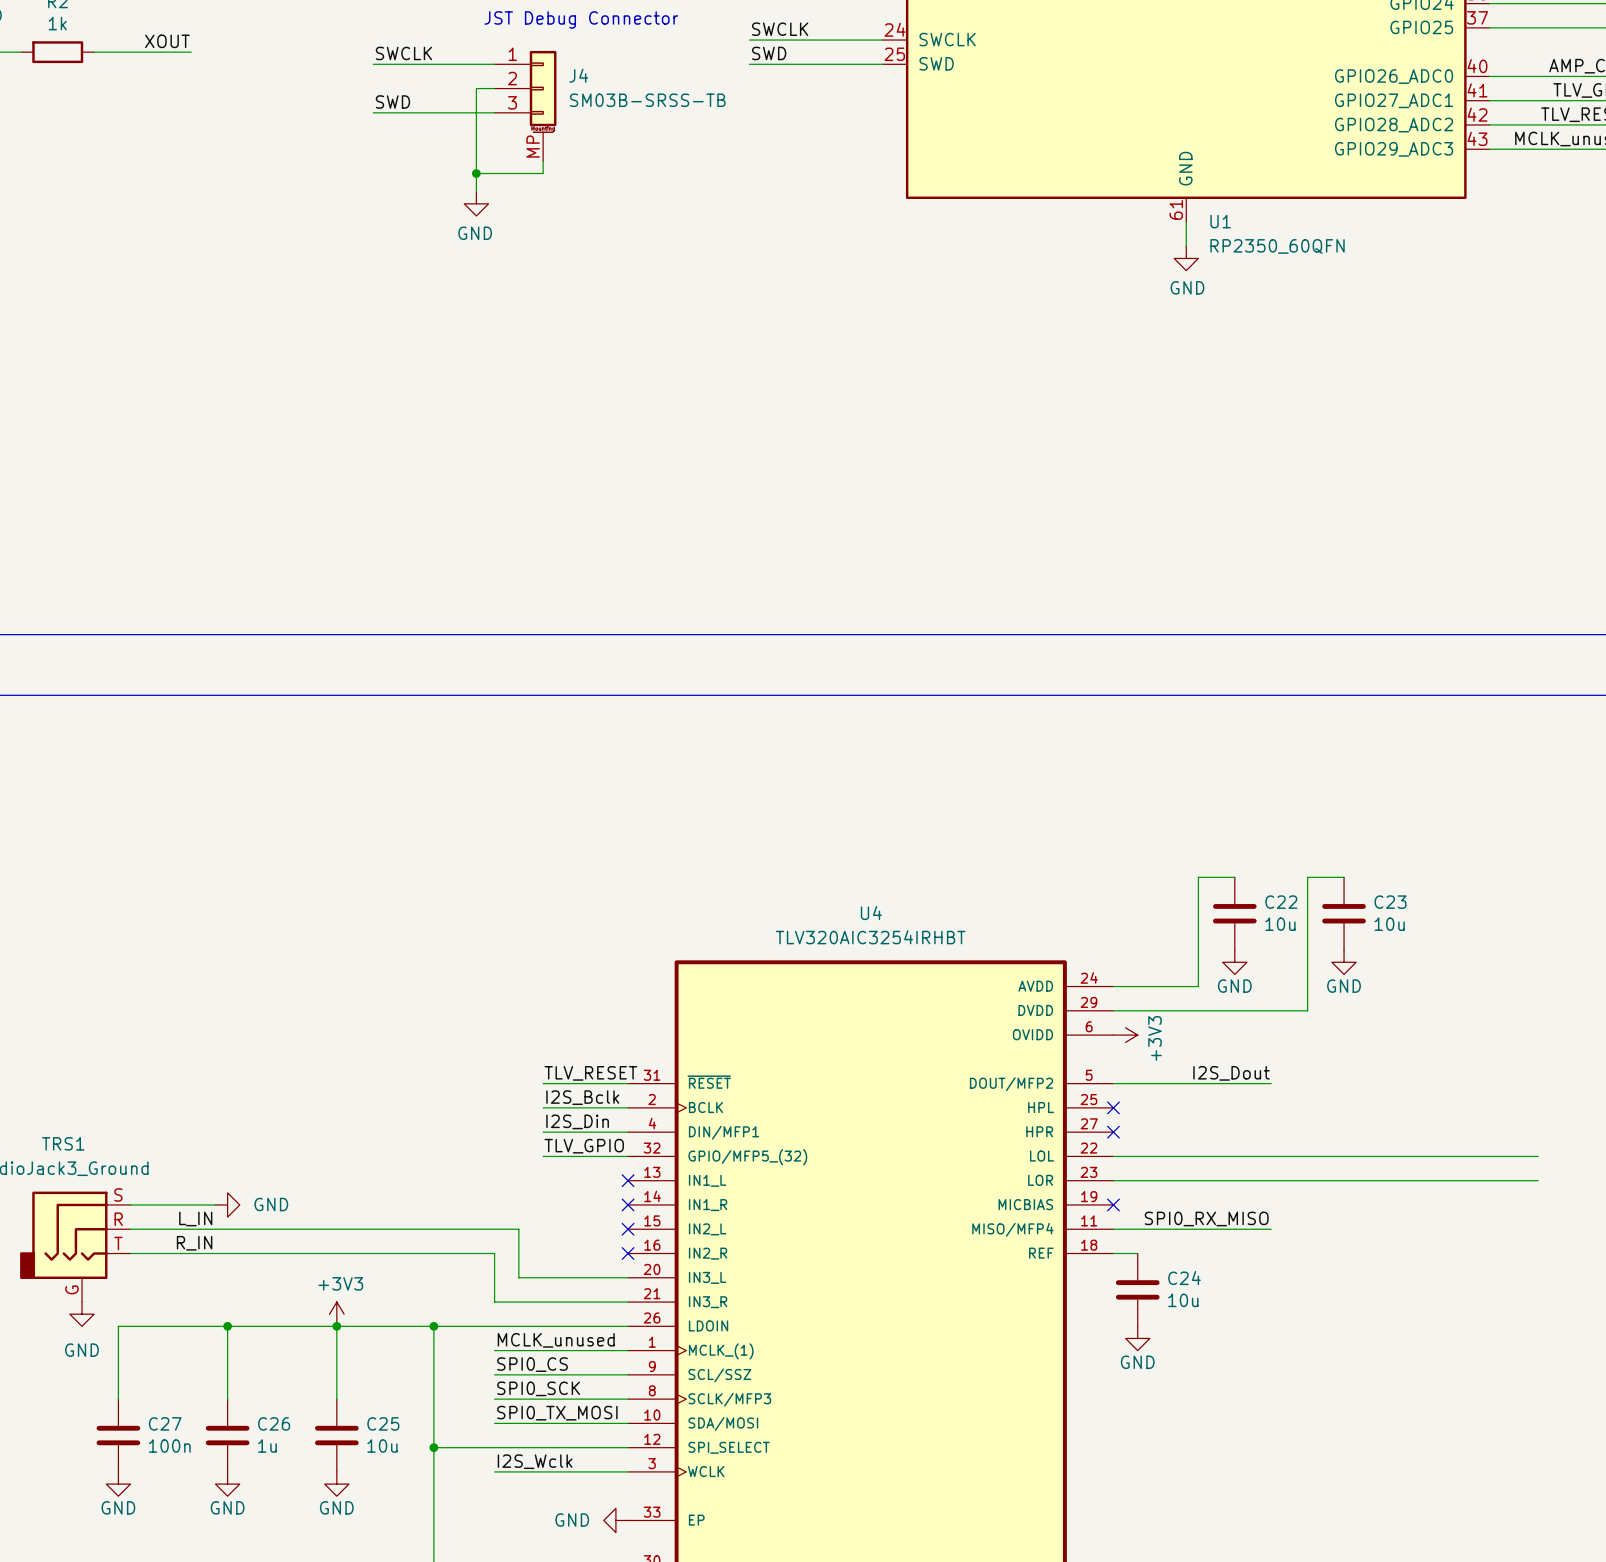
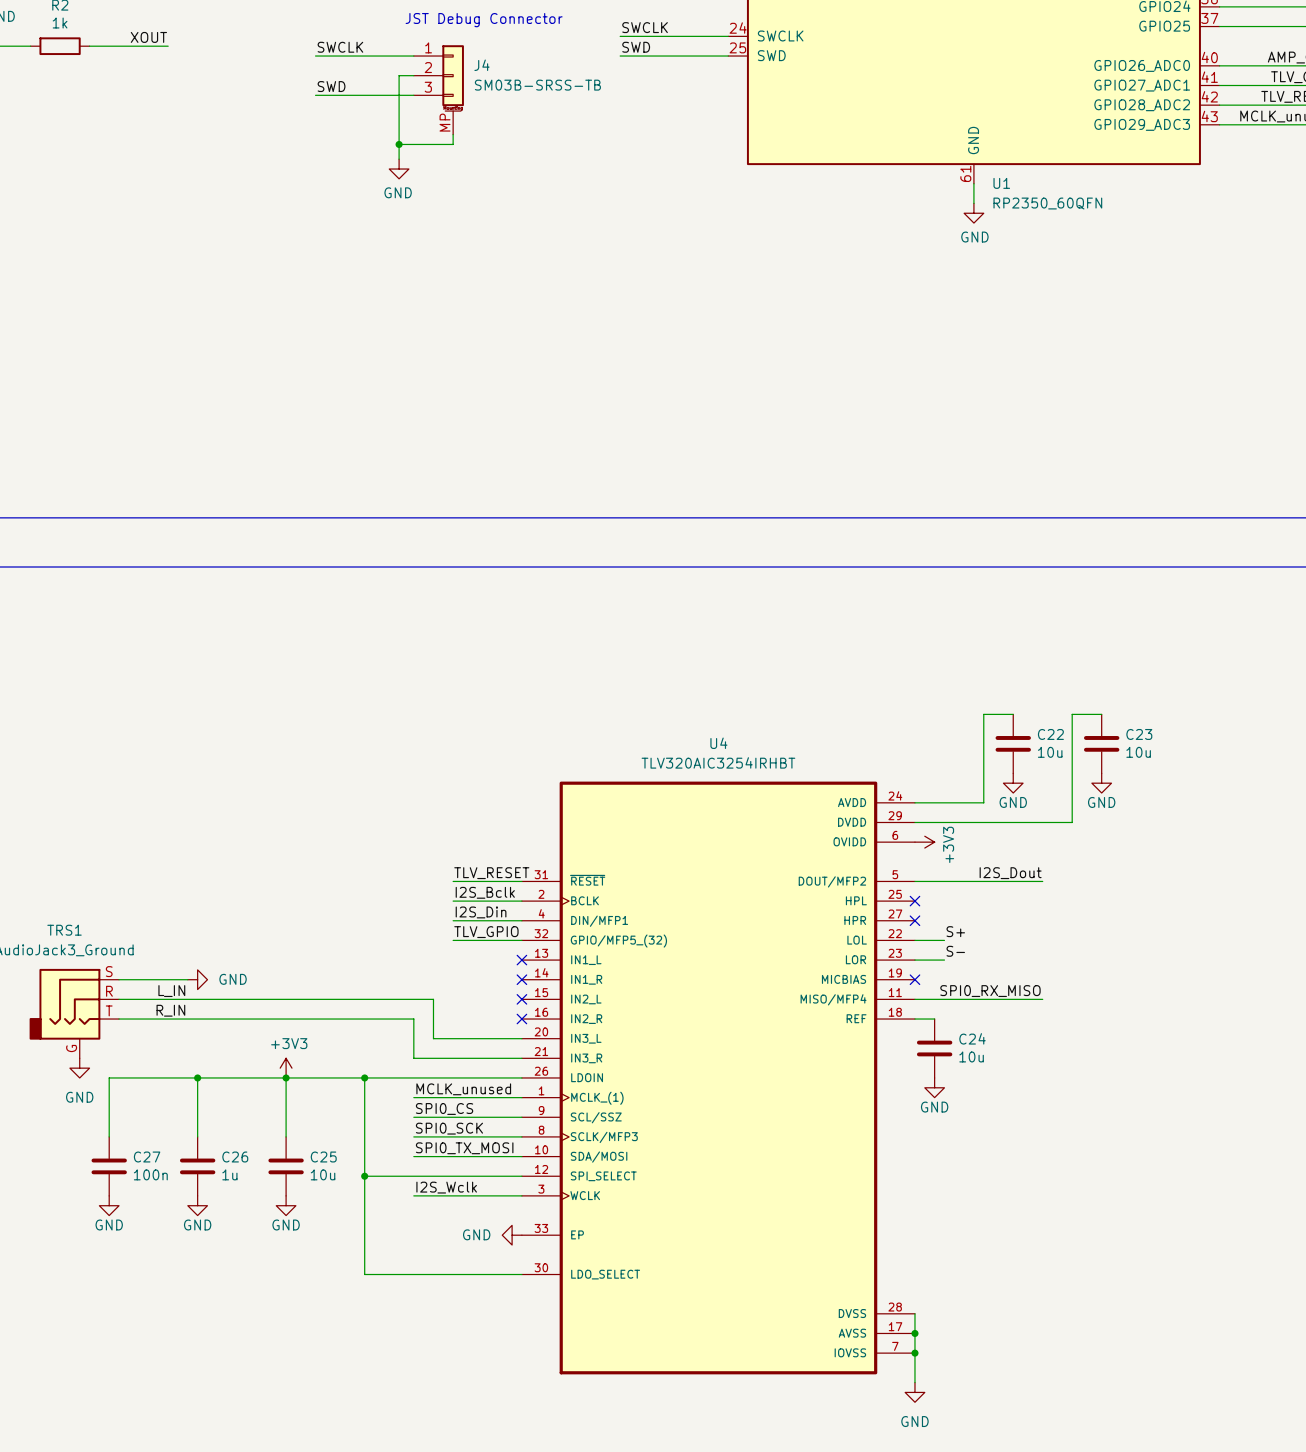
label: none -> S+ (955, 931)
wire: (1149, 1156) (1538, 1156) -> none
label: none -> S- (955, 951)
wire: (1149, 1180) (1538, 1180) -> none

